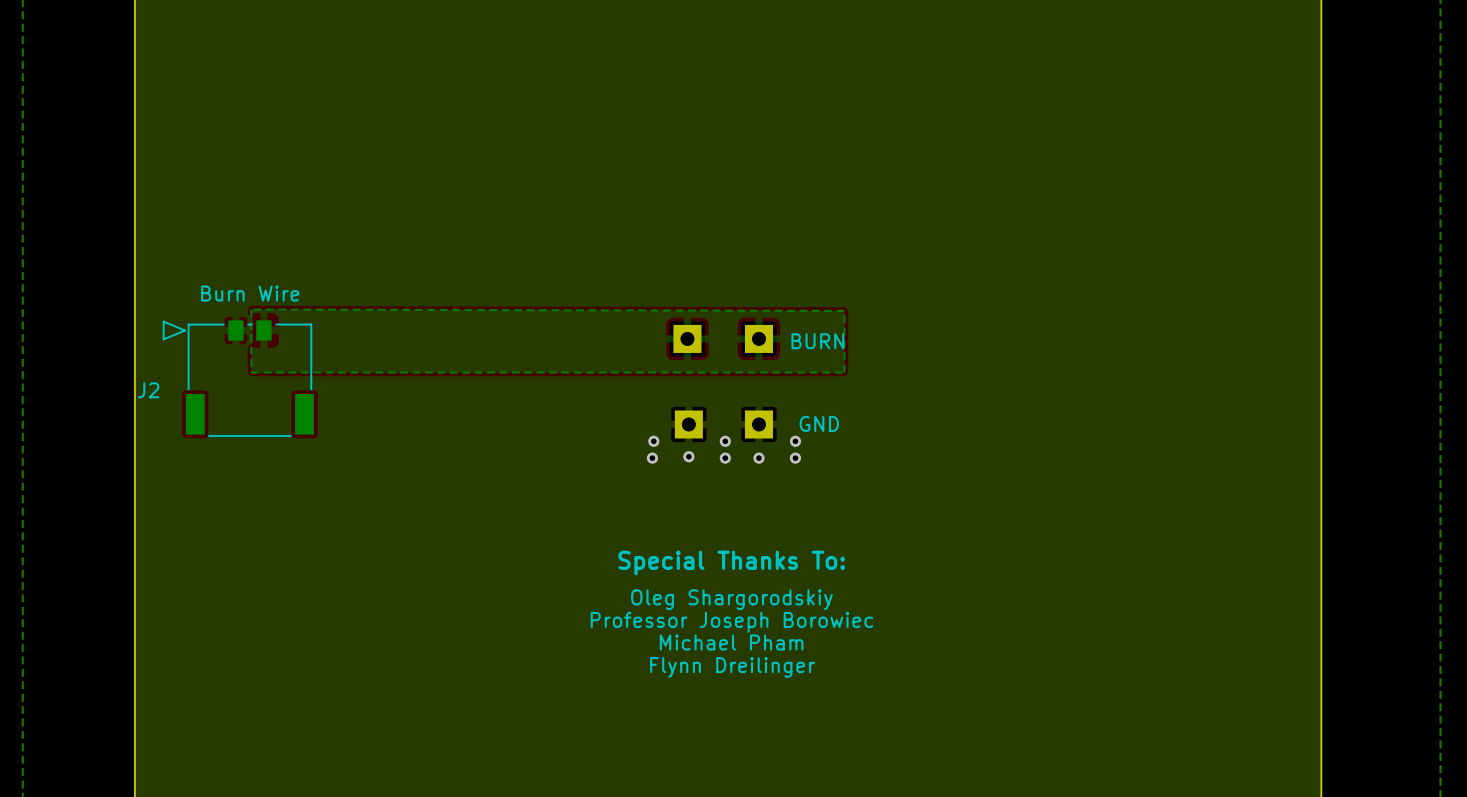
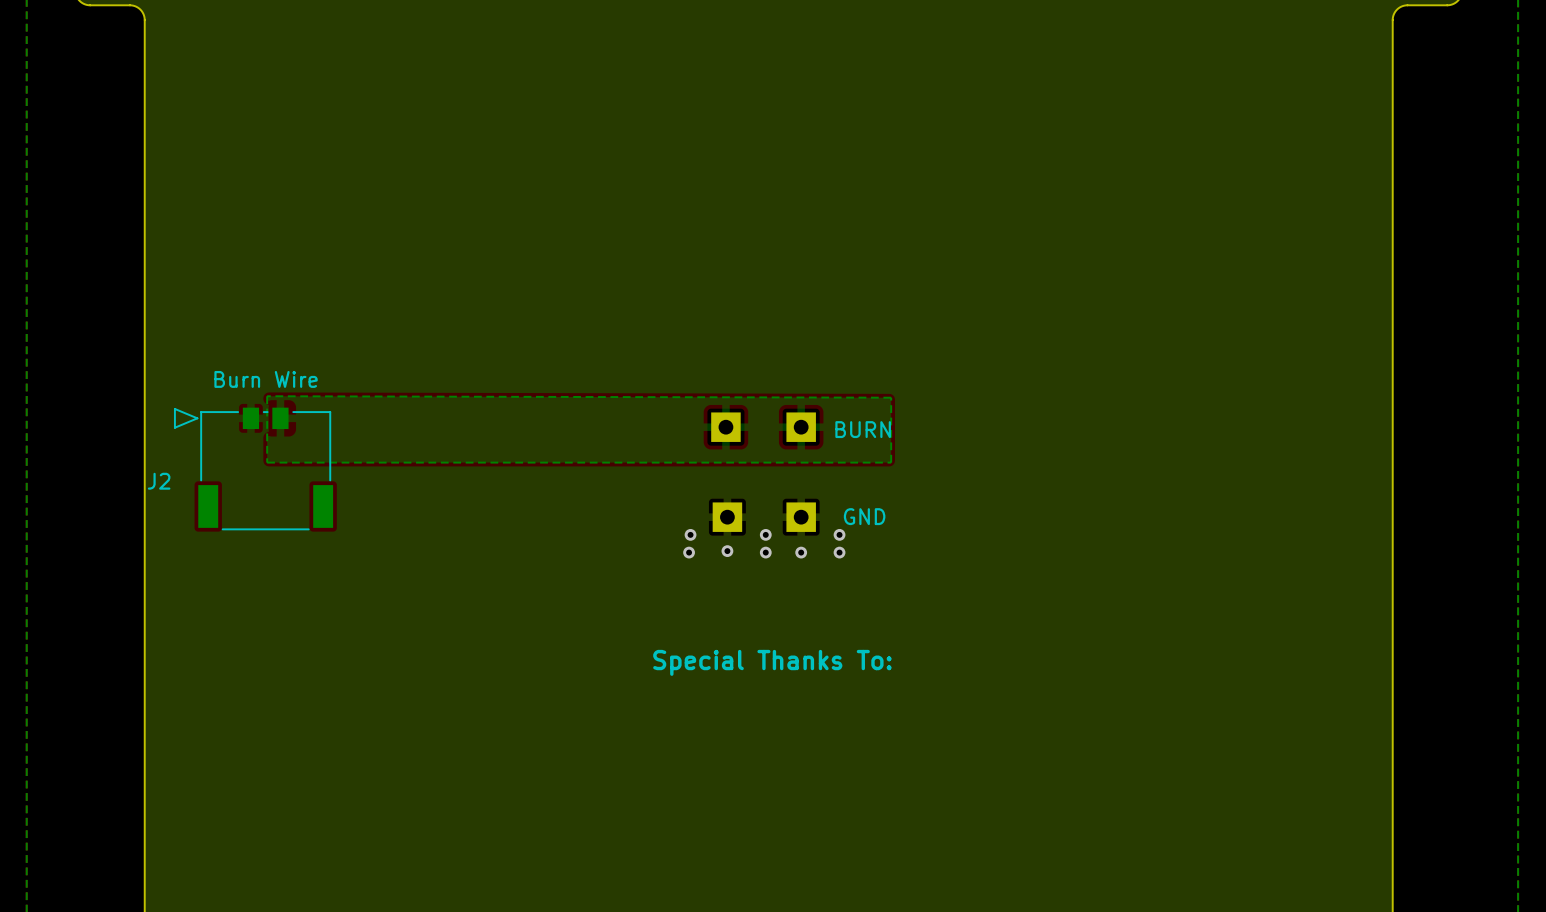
text: Oleg Shargorodskiy (731, 599) -> none
text: Professor Joseph Borowiec (731, 622) -> none
text: Michael Pham (731, 642) -> none
text: Flynn Dreilinger (732, 667) -> none

